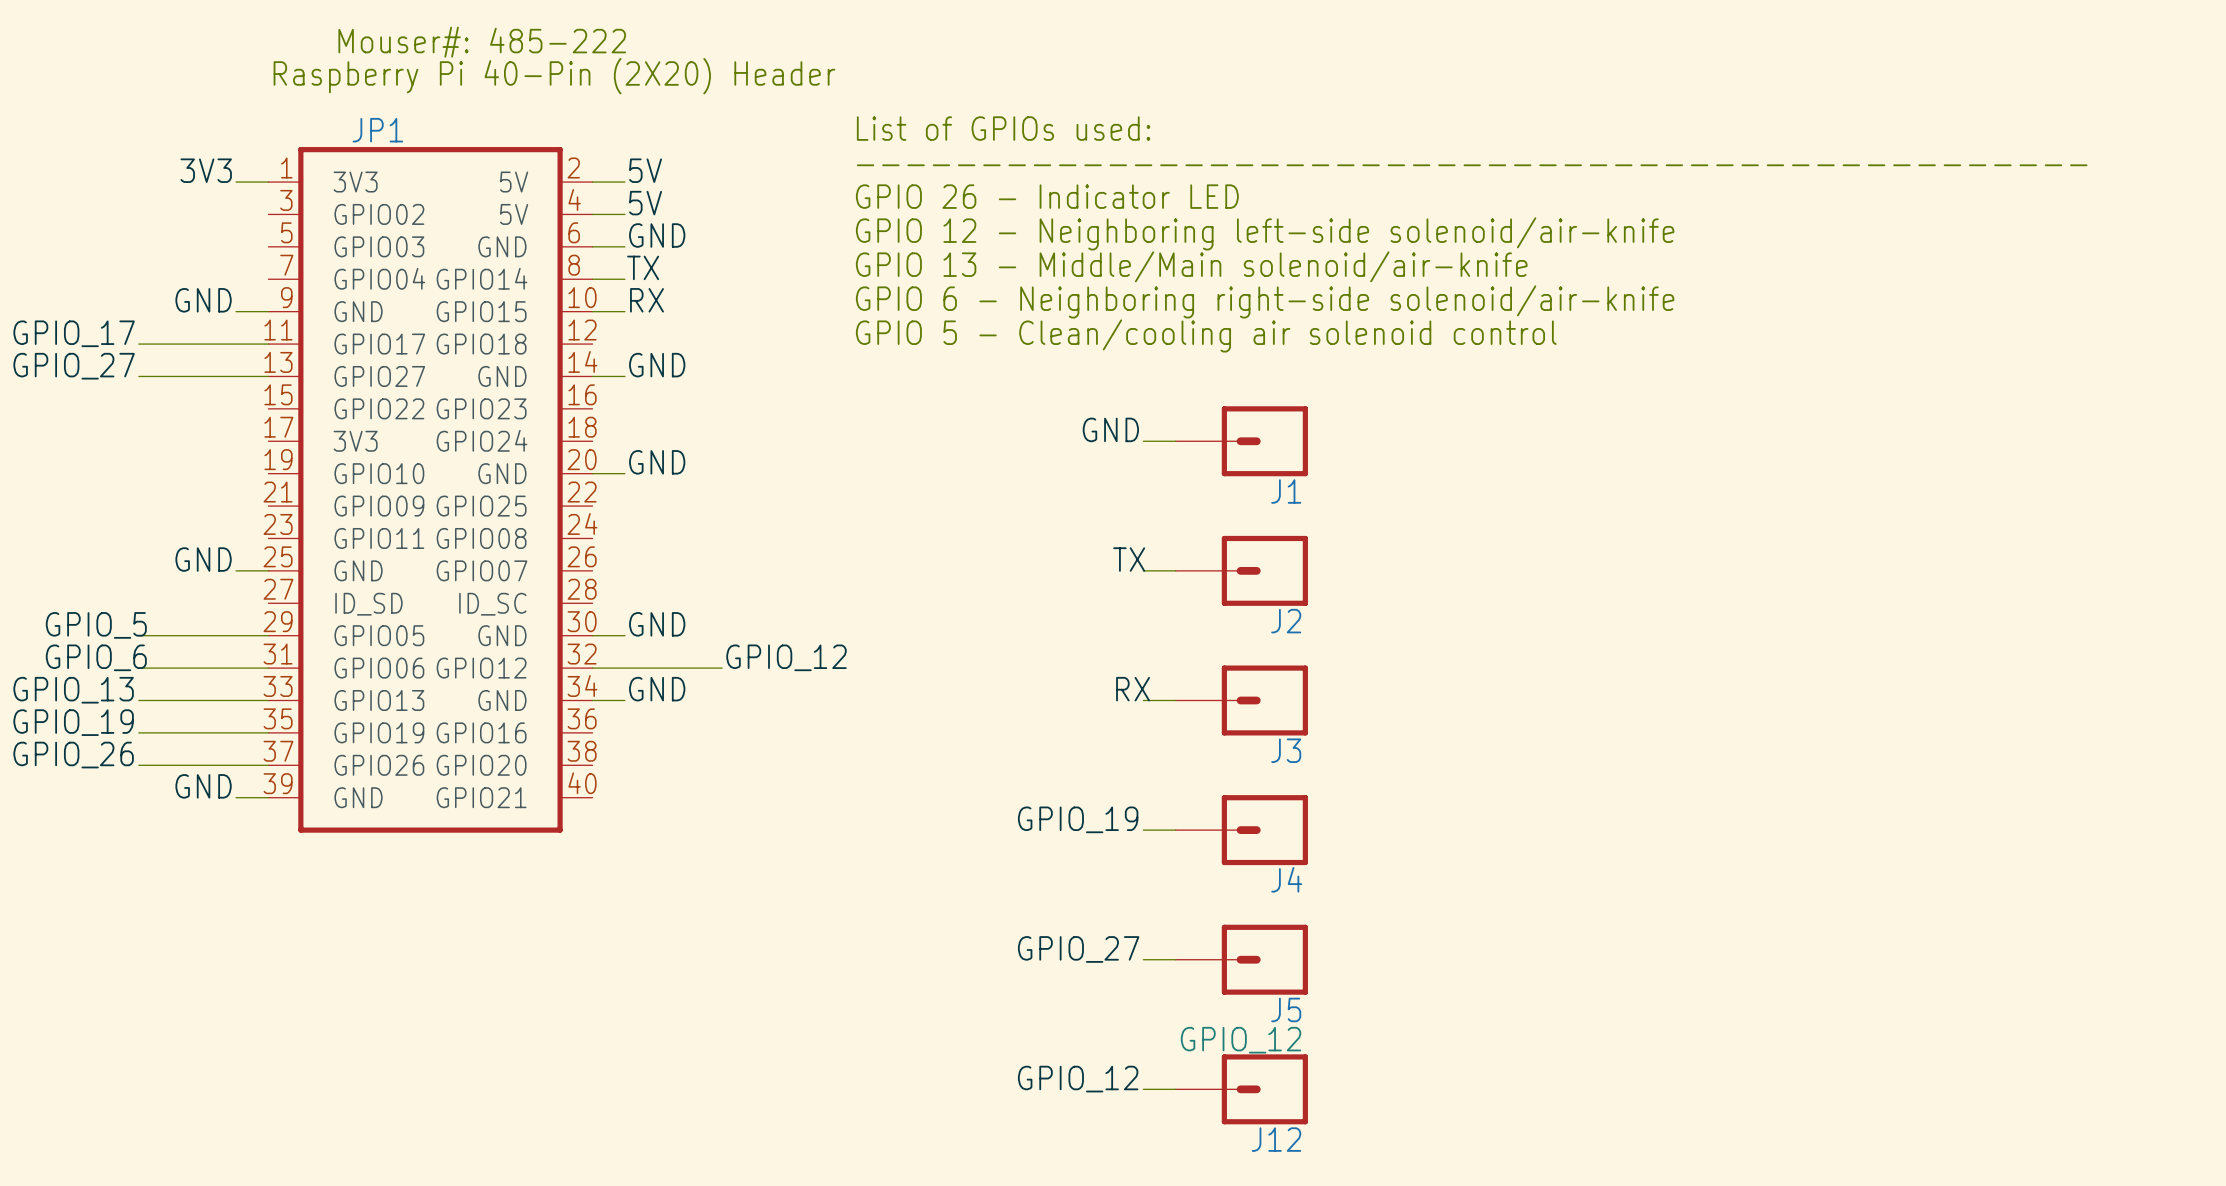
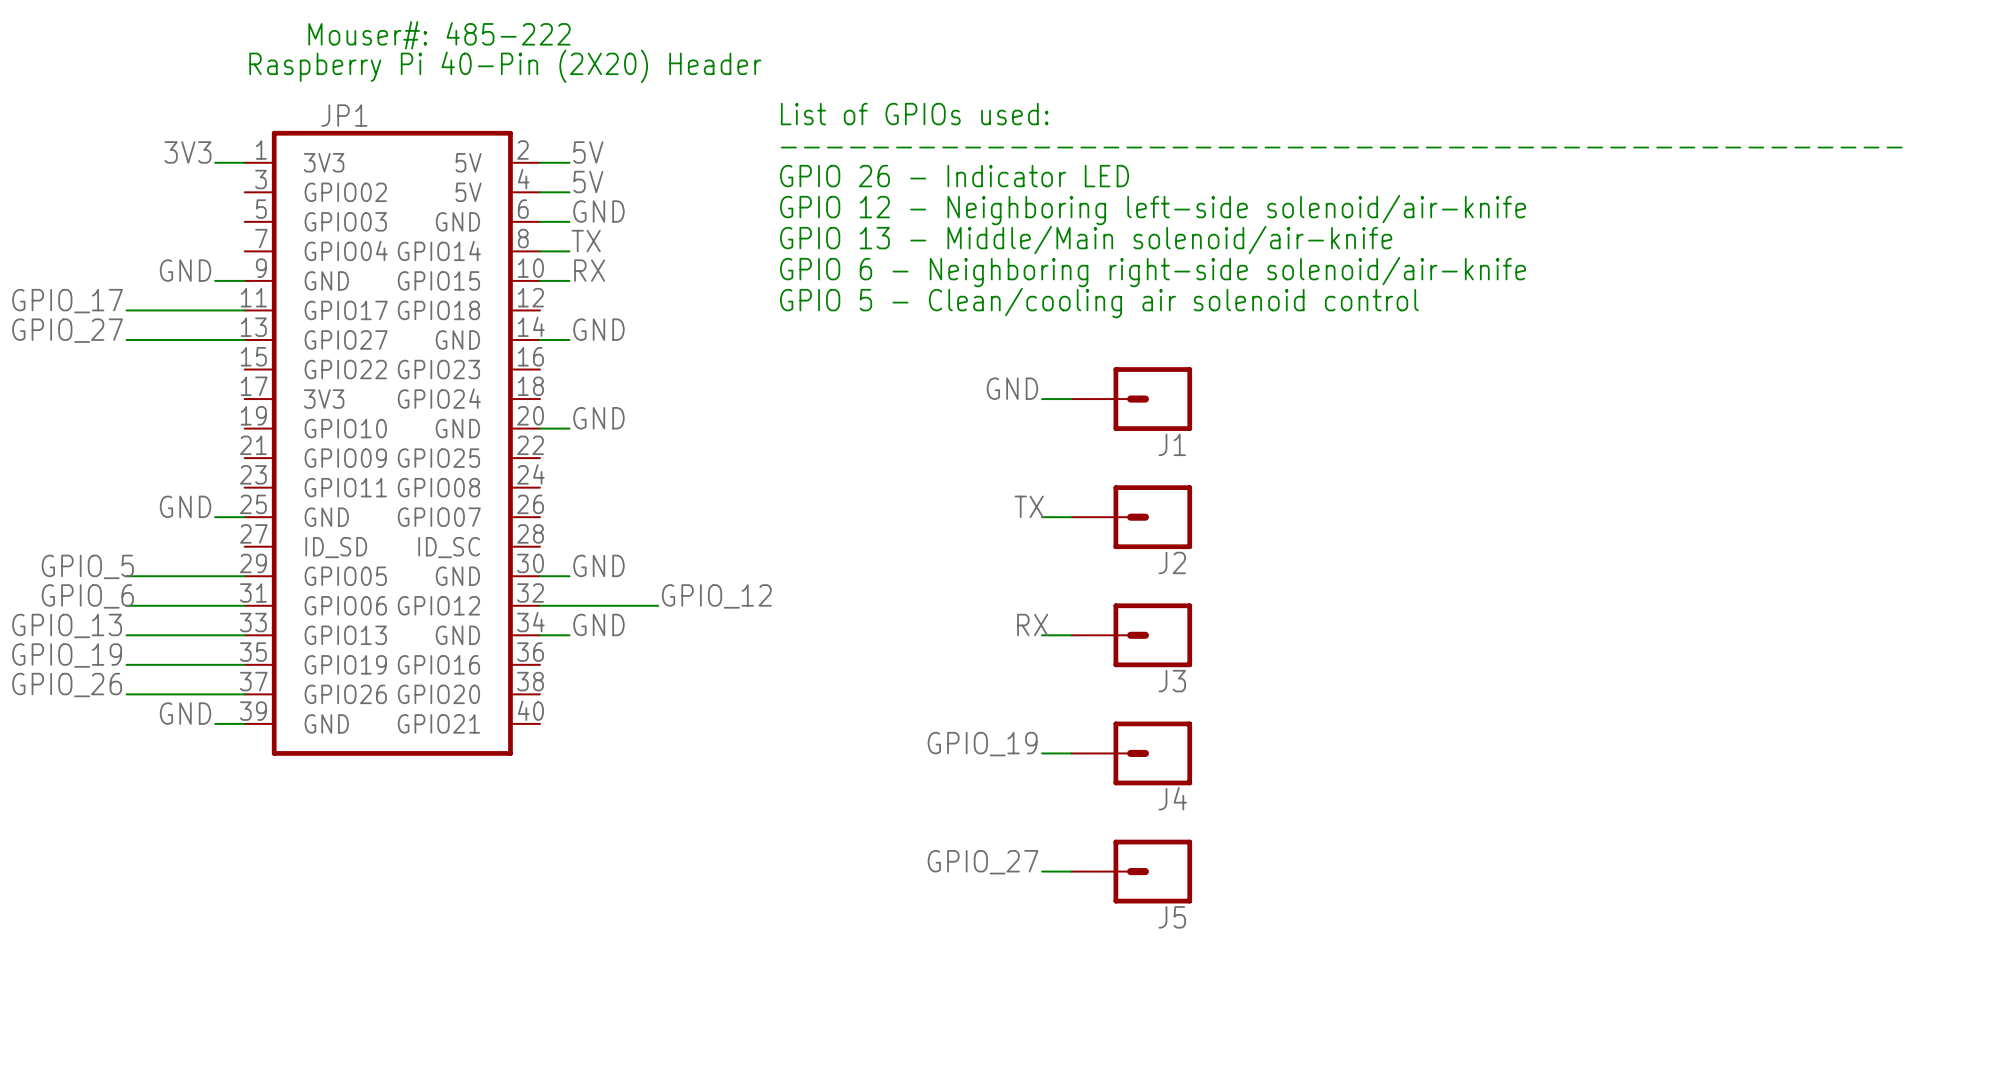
label: GPIO_12 (1078, 1079) -> none
wire: (1143, 1089) (1175, 1089) -> none
J12: GPIO_12 (1241, 1089) -> none

